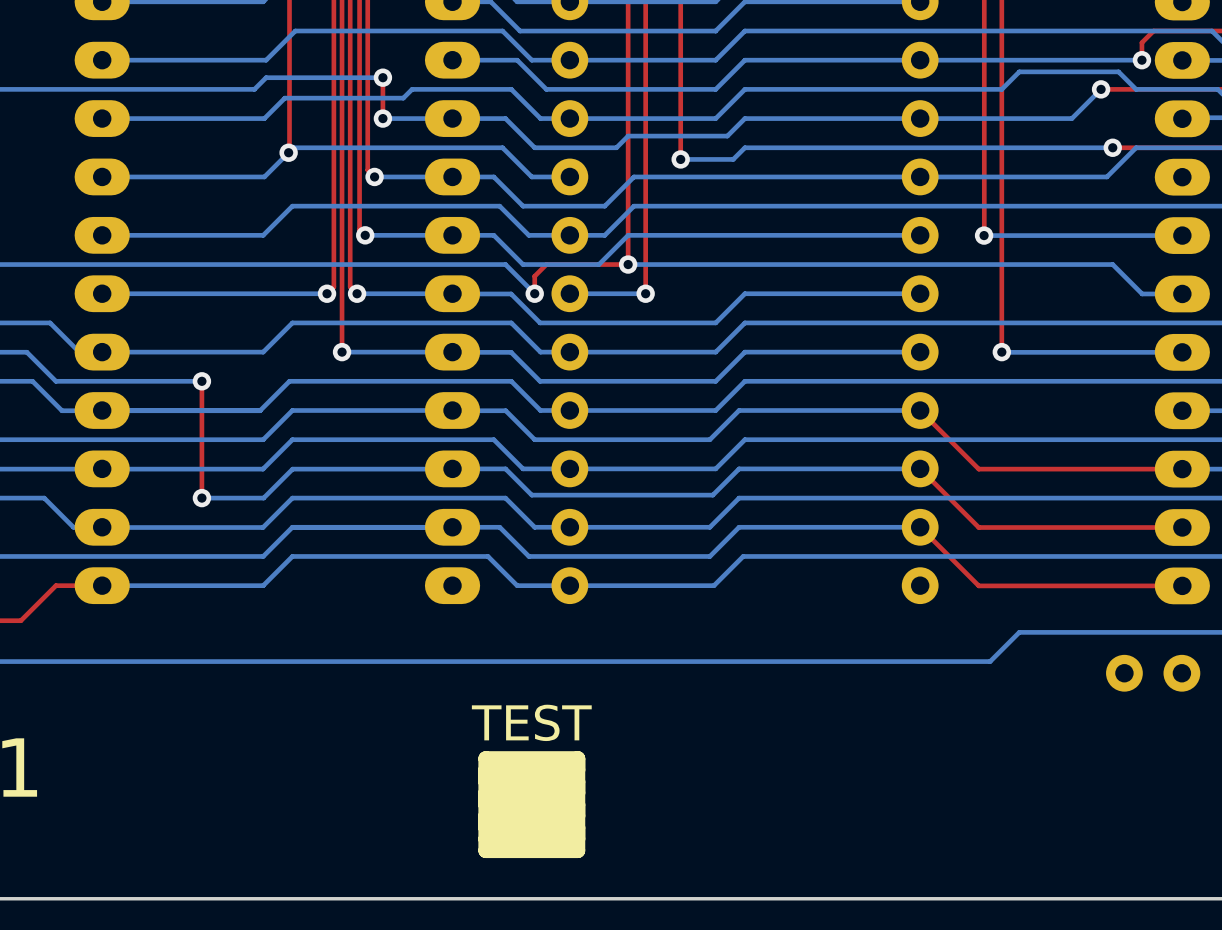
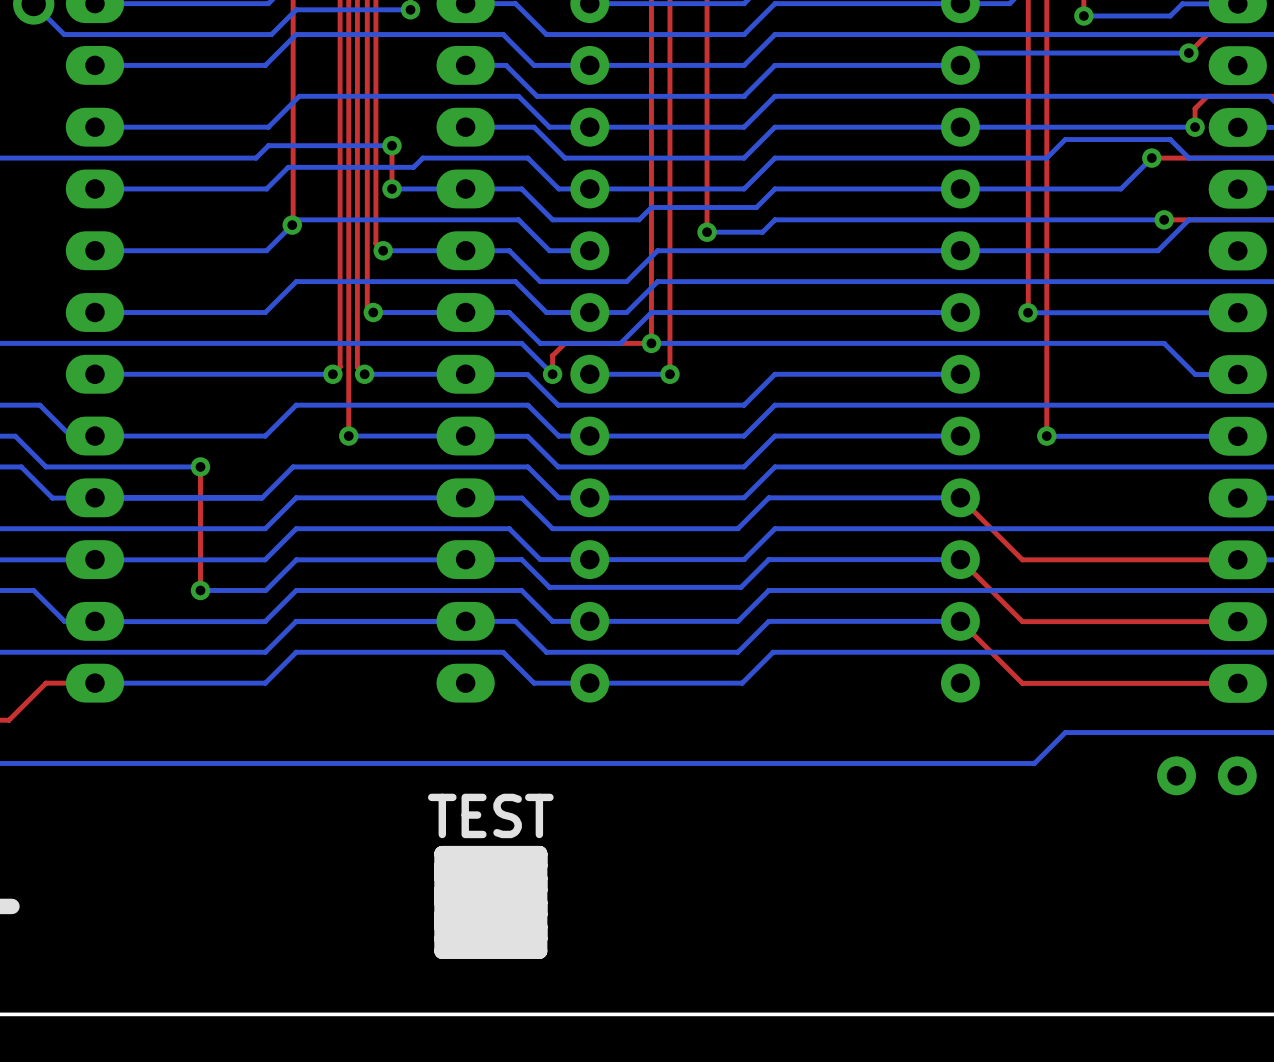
TEST position: (531, 804) -> (490, 902)

